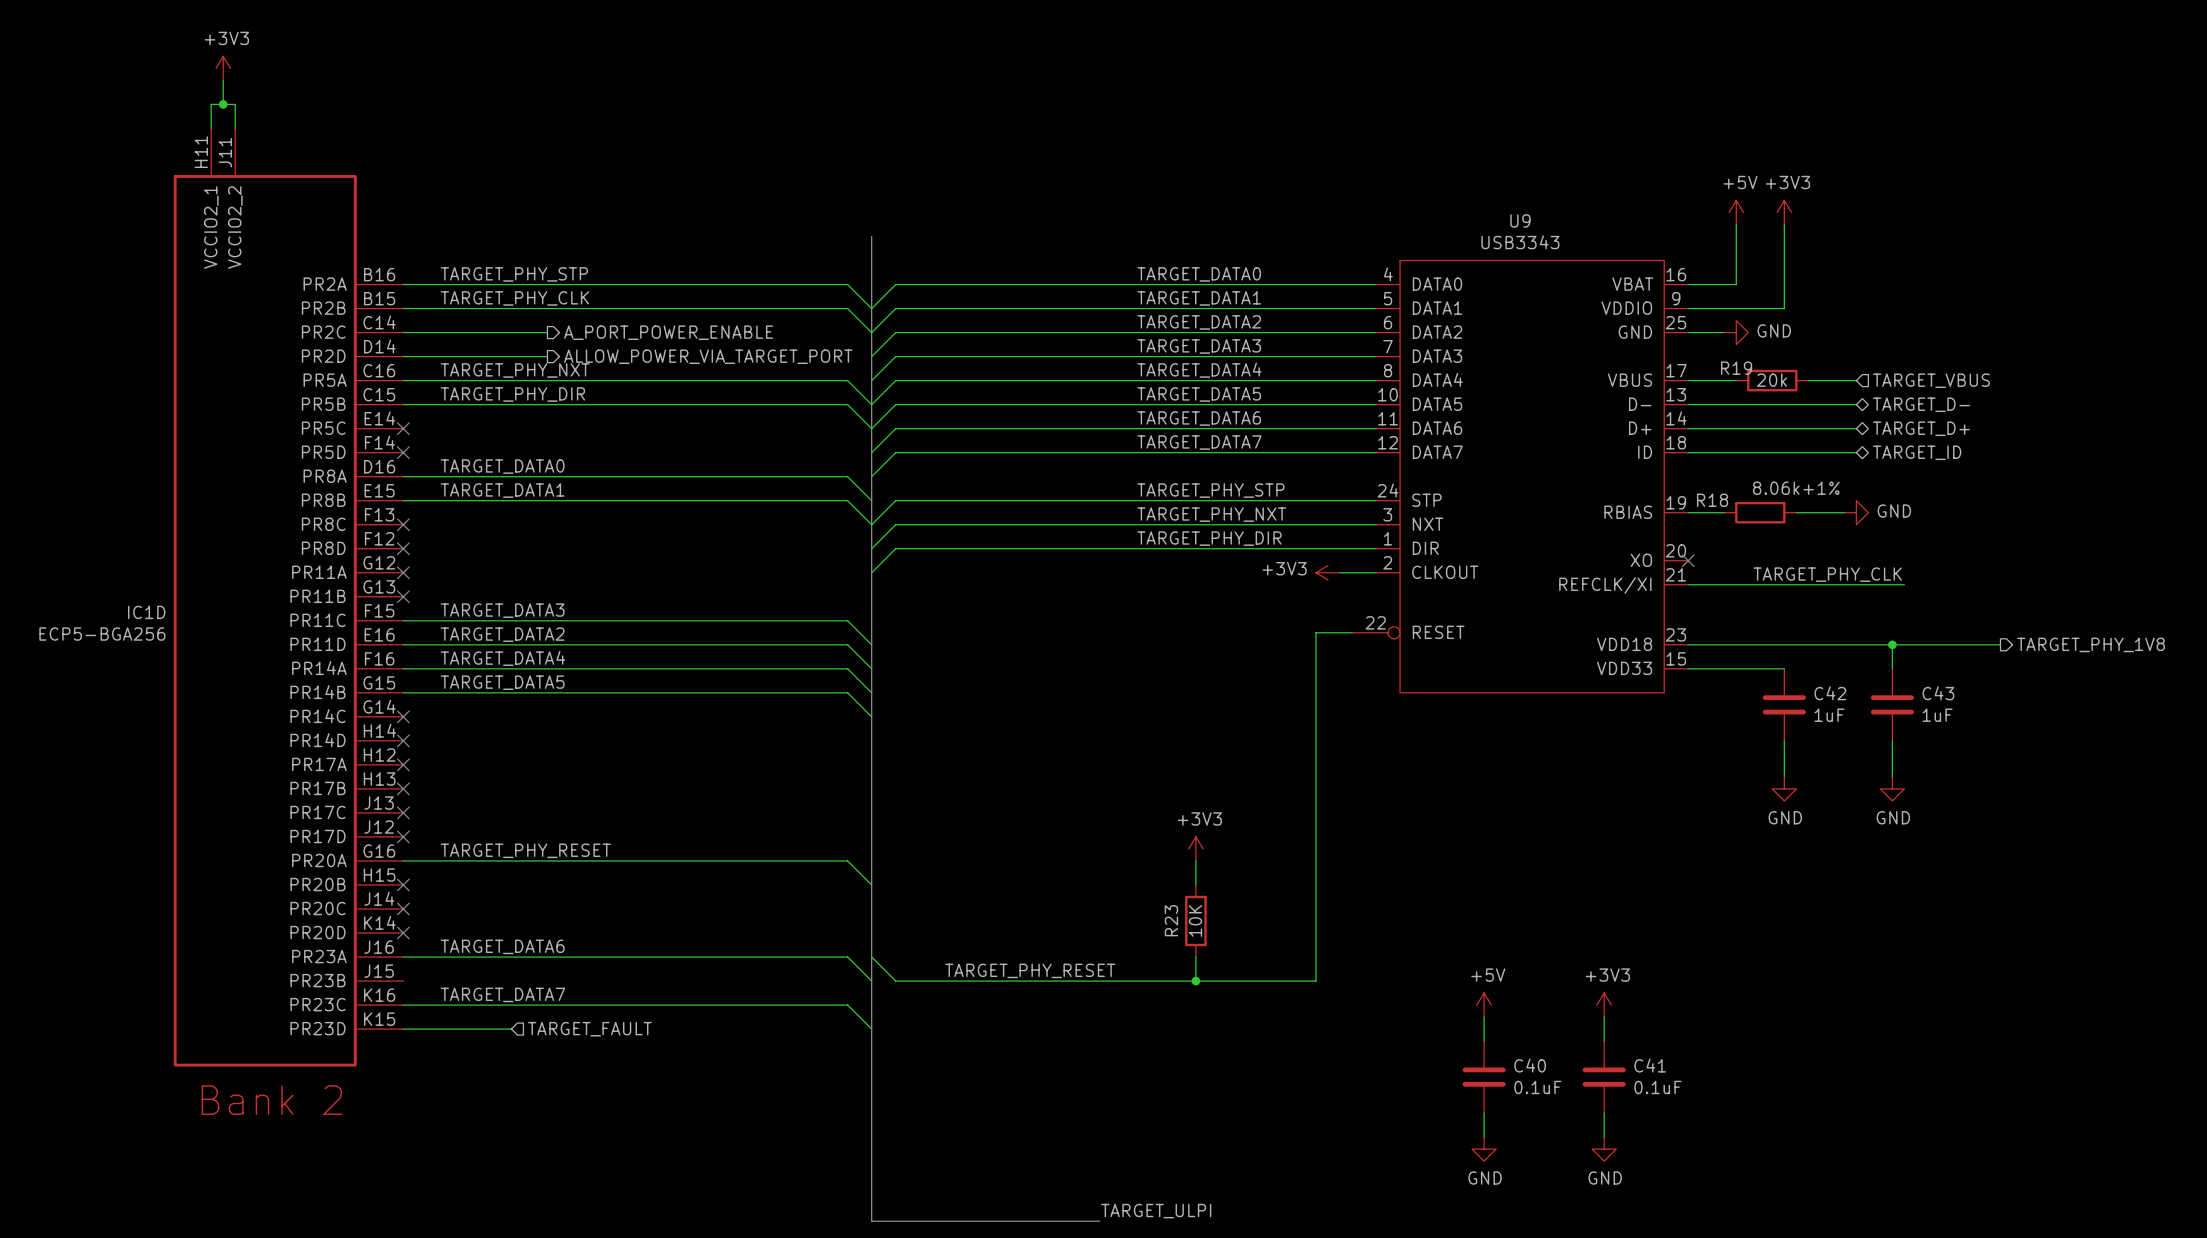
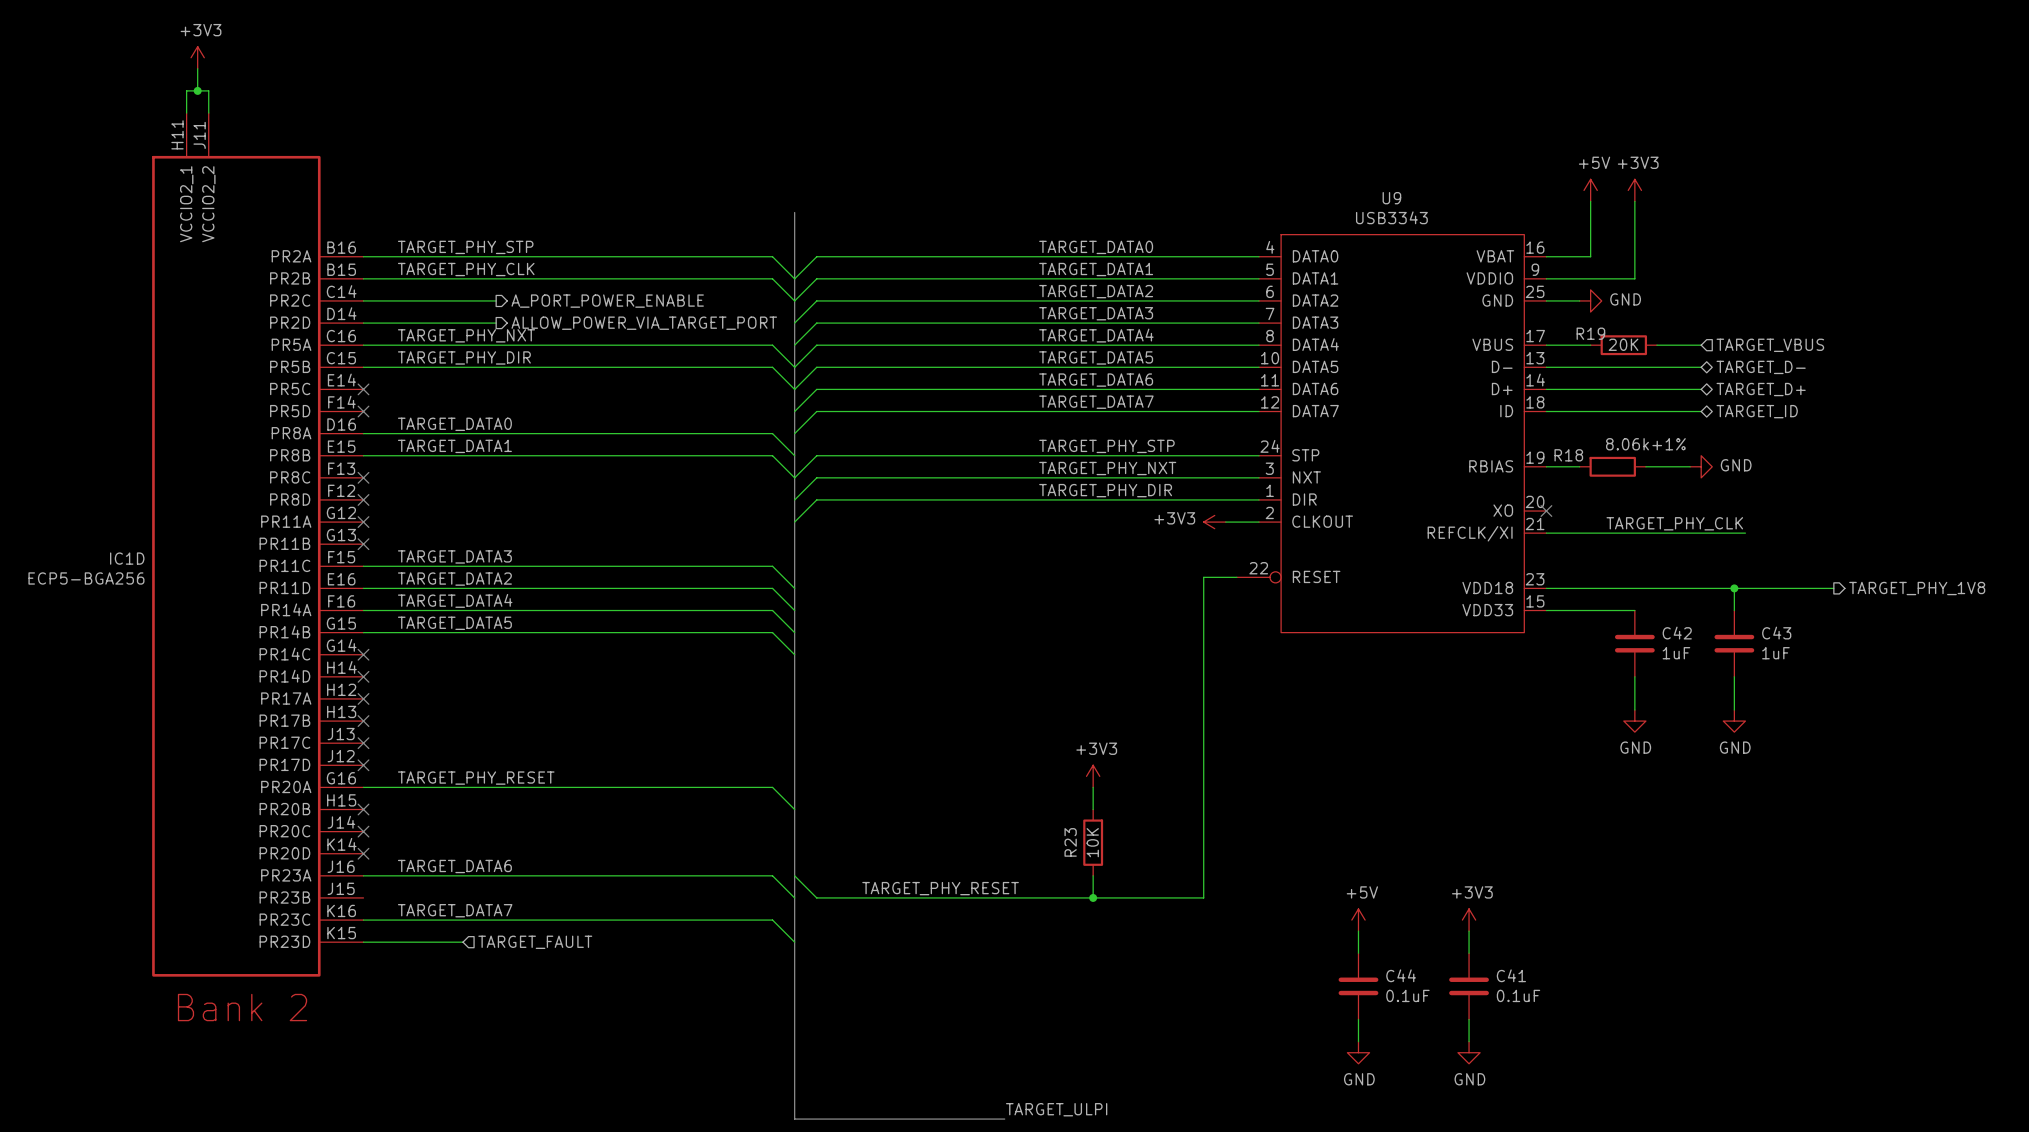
R19 value: 20k (1772, 380) -> 20K (1623, 344)
C40 name: C40 (1530, 1065) -> C44 (1401, 975)

